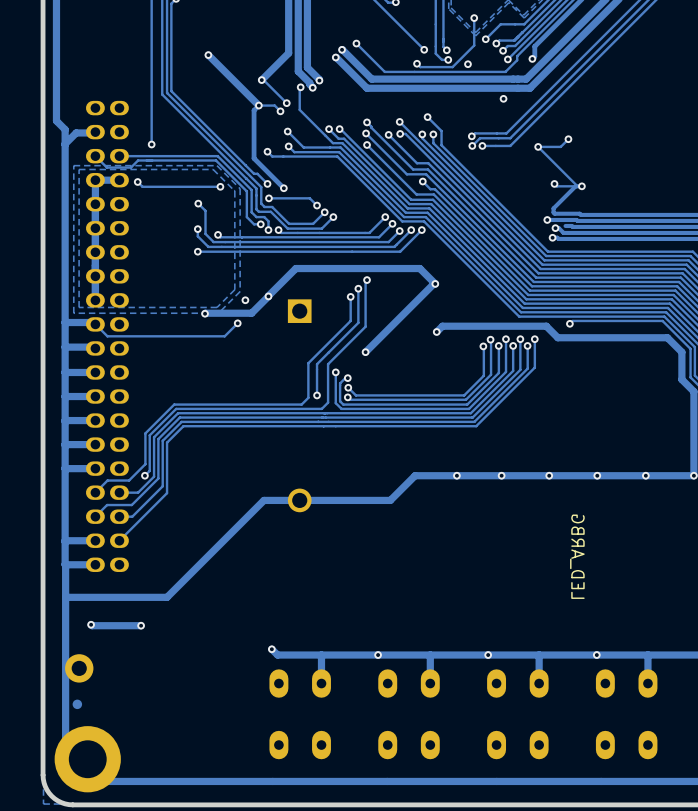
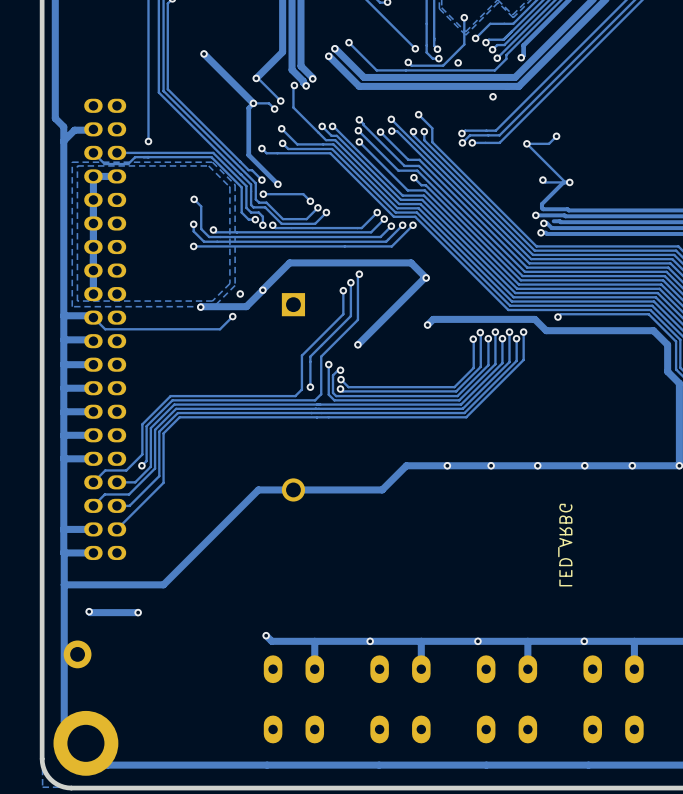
track: (137, 182) (142, 186) (220, 186) -> none
via: (137, 182) -> none
via: (220, 186) -> none
part: (77, 704) -> none

